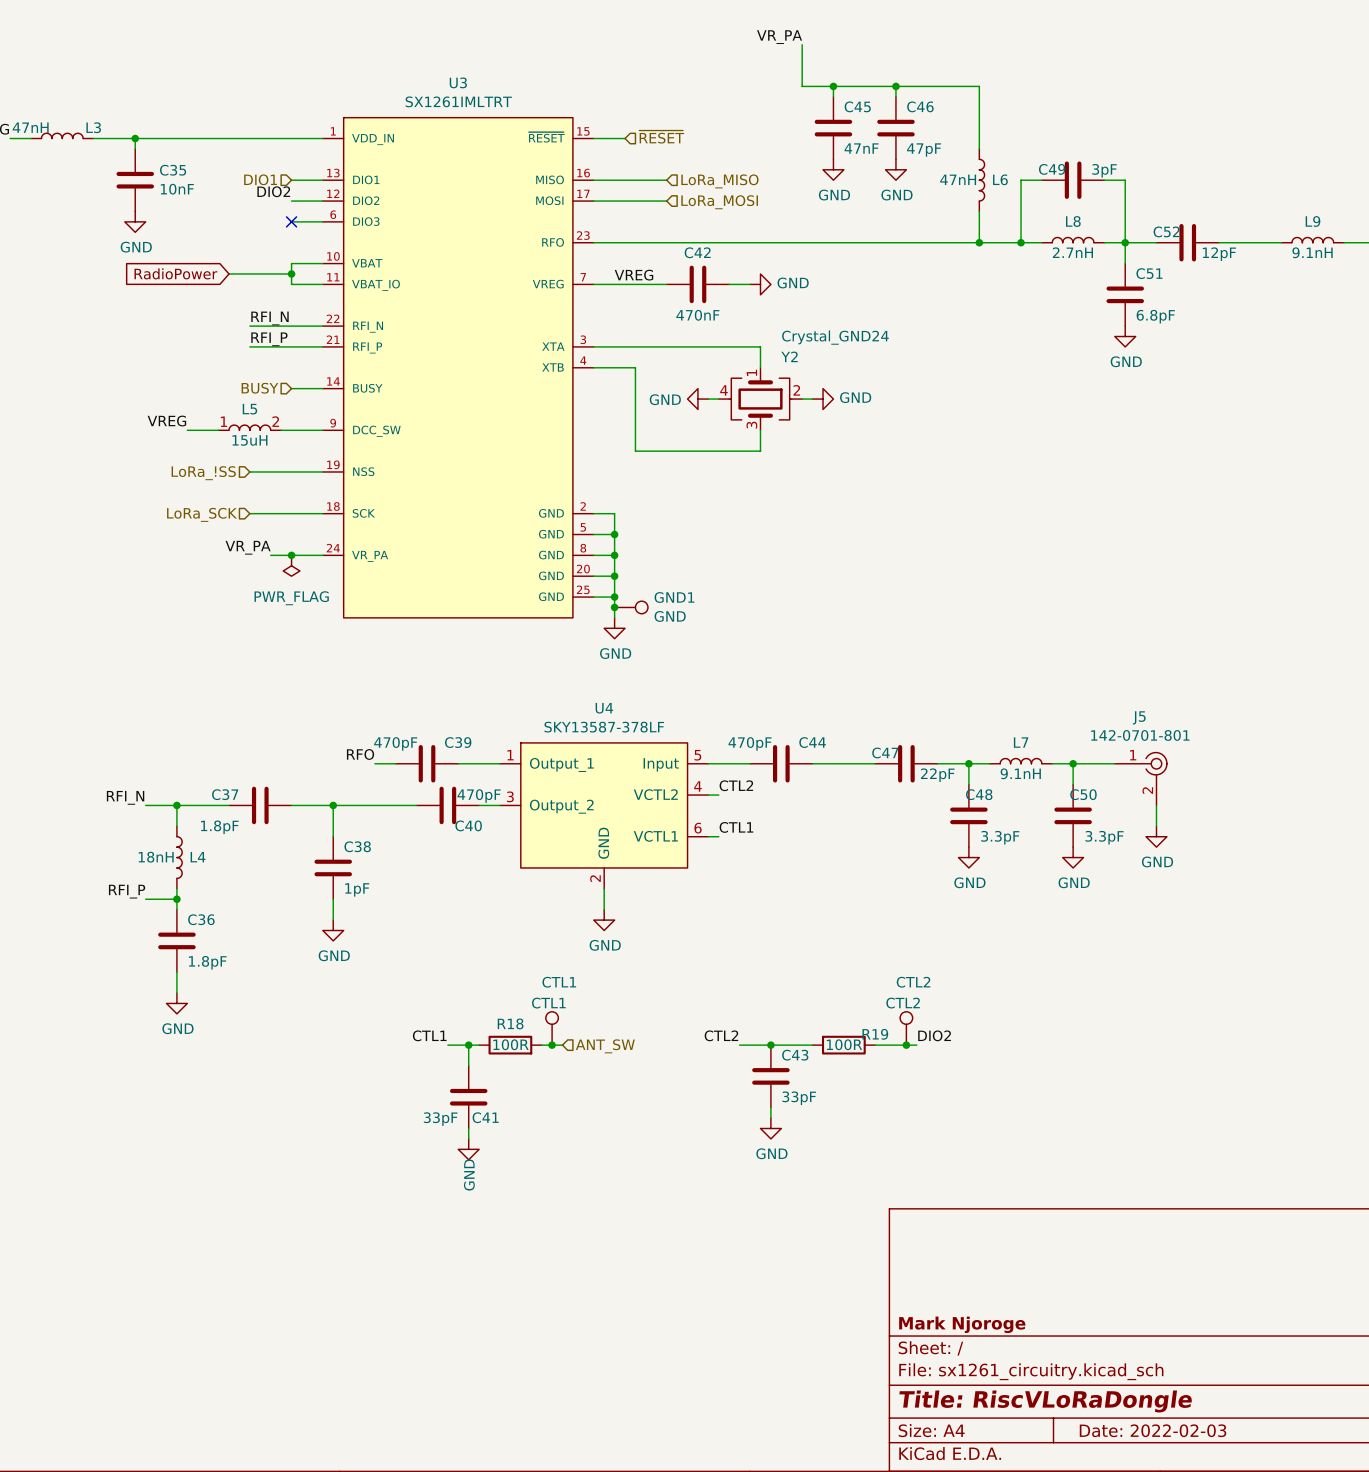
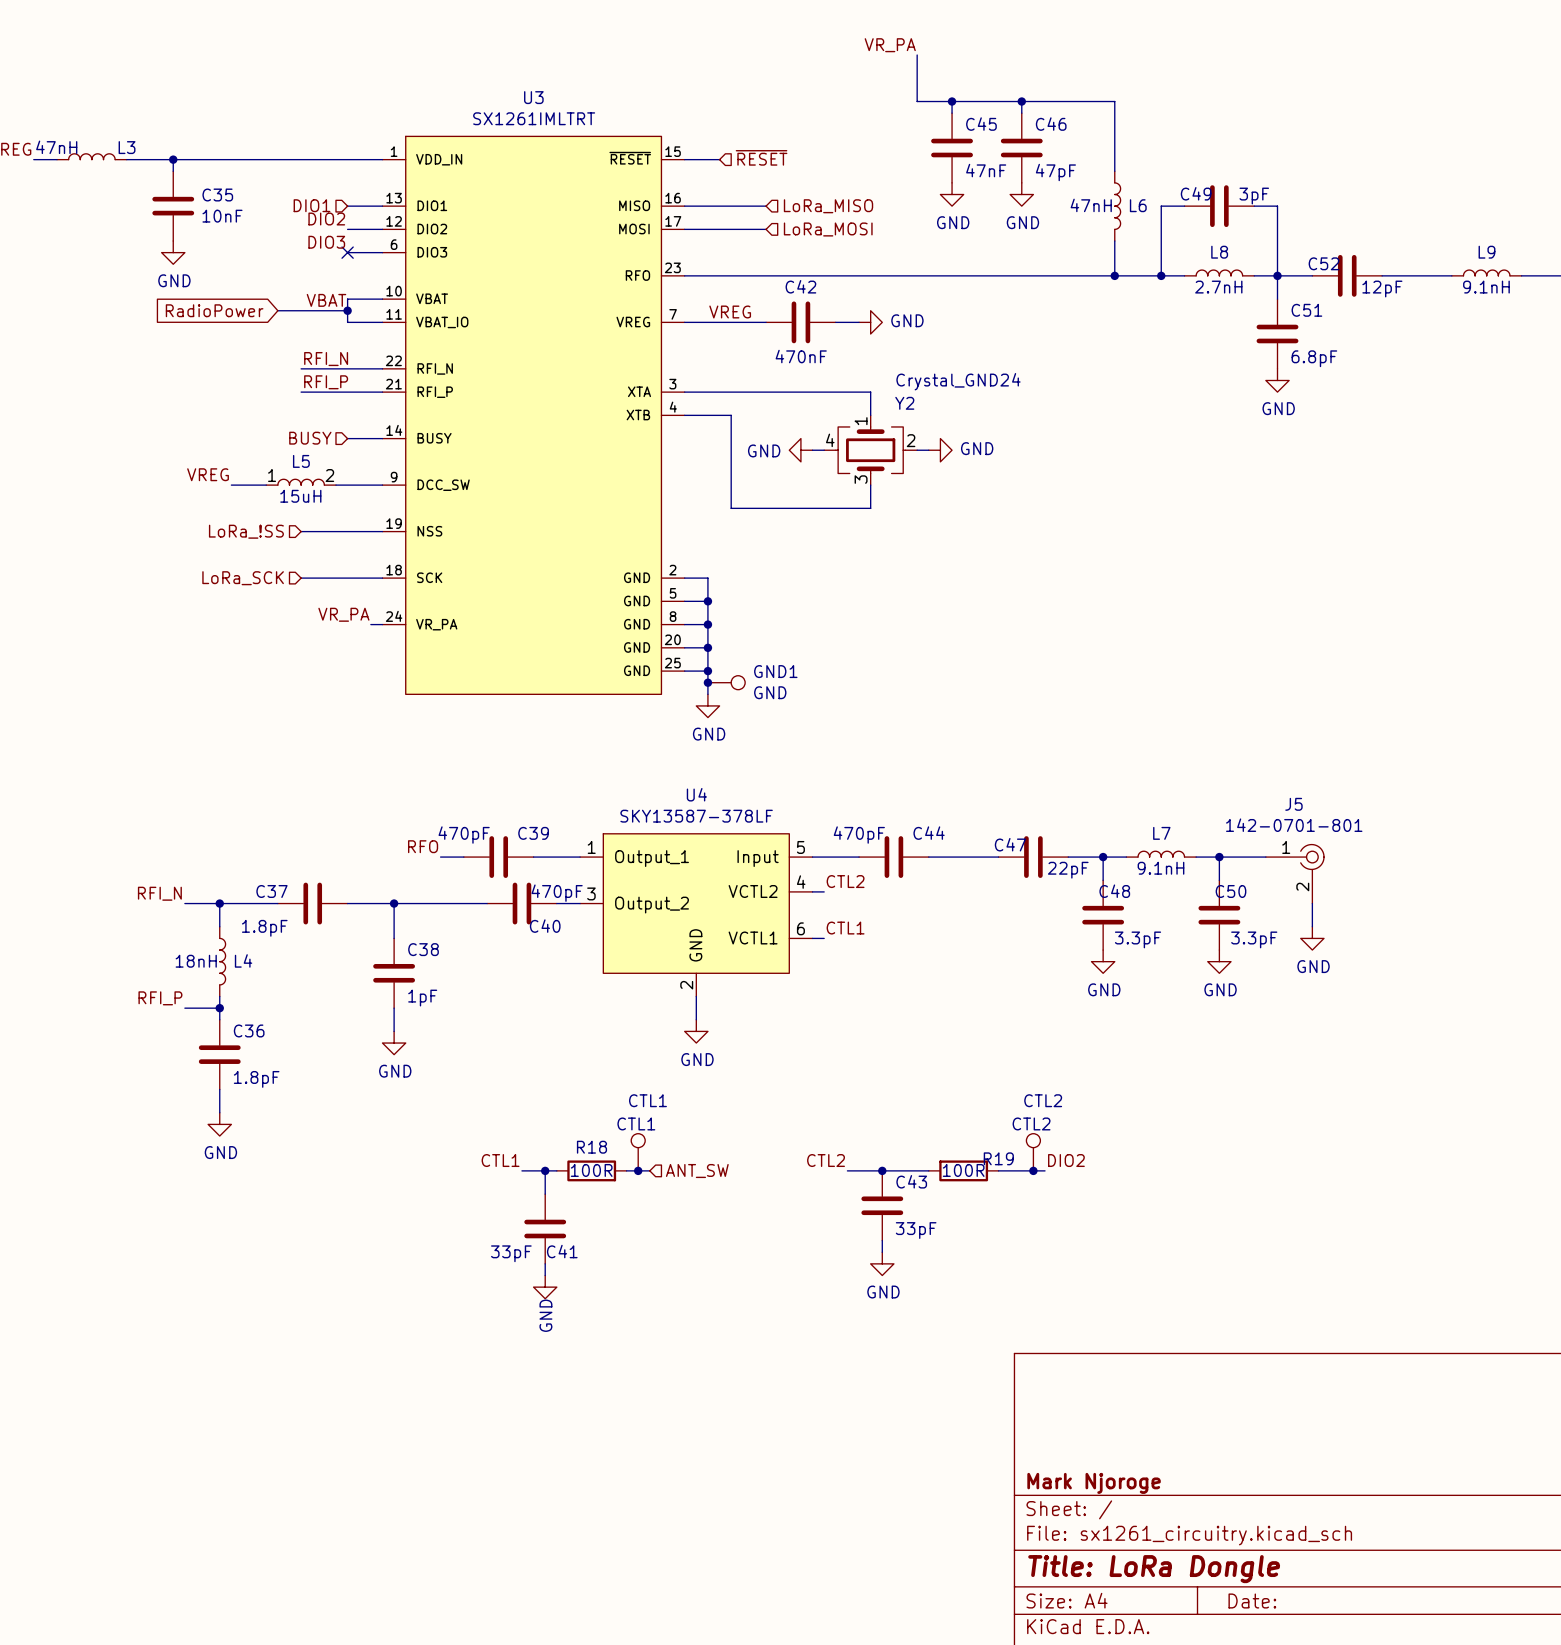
label: none -> DIO3 (326, 242)
label: none -> VBAT (326, 300)
label position: VR_PA (248, 547) -> VR_PA (343, 614)
wire: (270, 555) (312, 555) -> none
junction: (291, 555) -> none
power symbol: PWR_FLAG (291, 565) -> none
title block: Title: RiscVLoRaDongle (1045, 1401) -> Title: LoRa Dongle (1154, 1569)
title block: Date: 2022-02-03 (1153, 1430) -> Date: (1252, 1601)

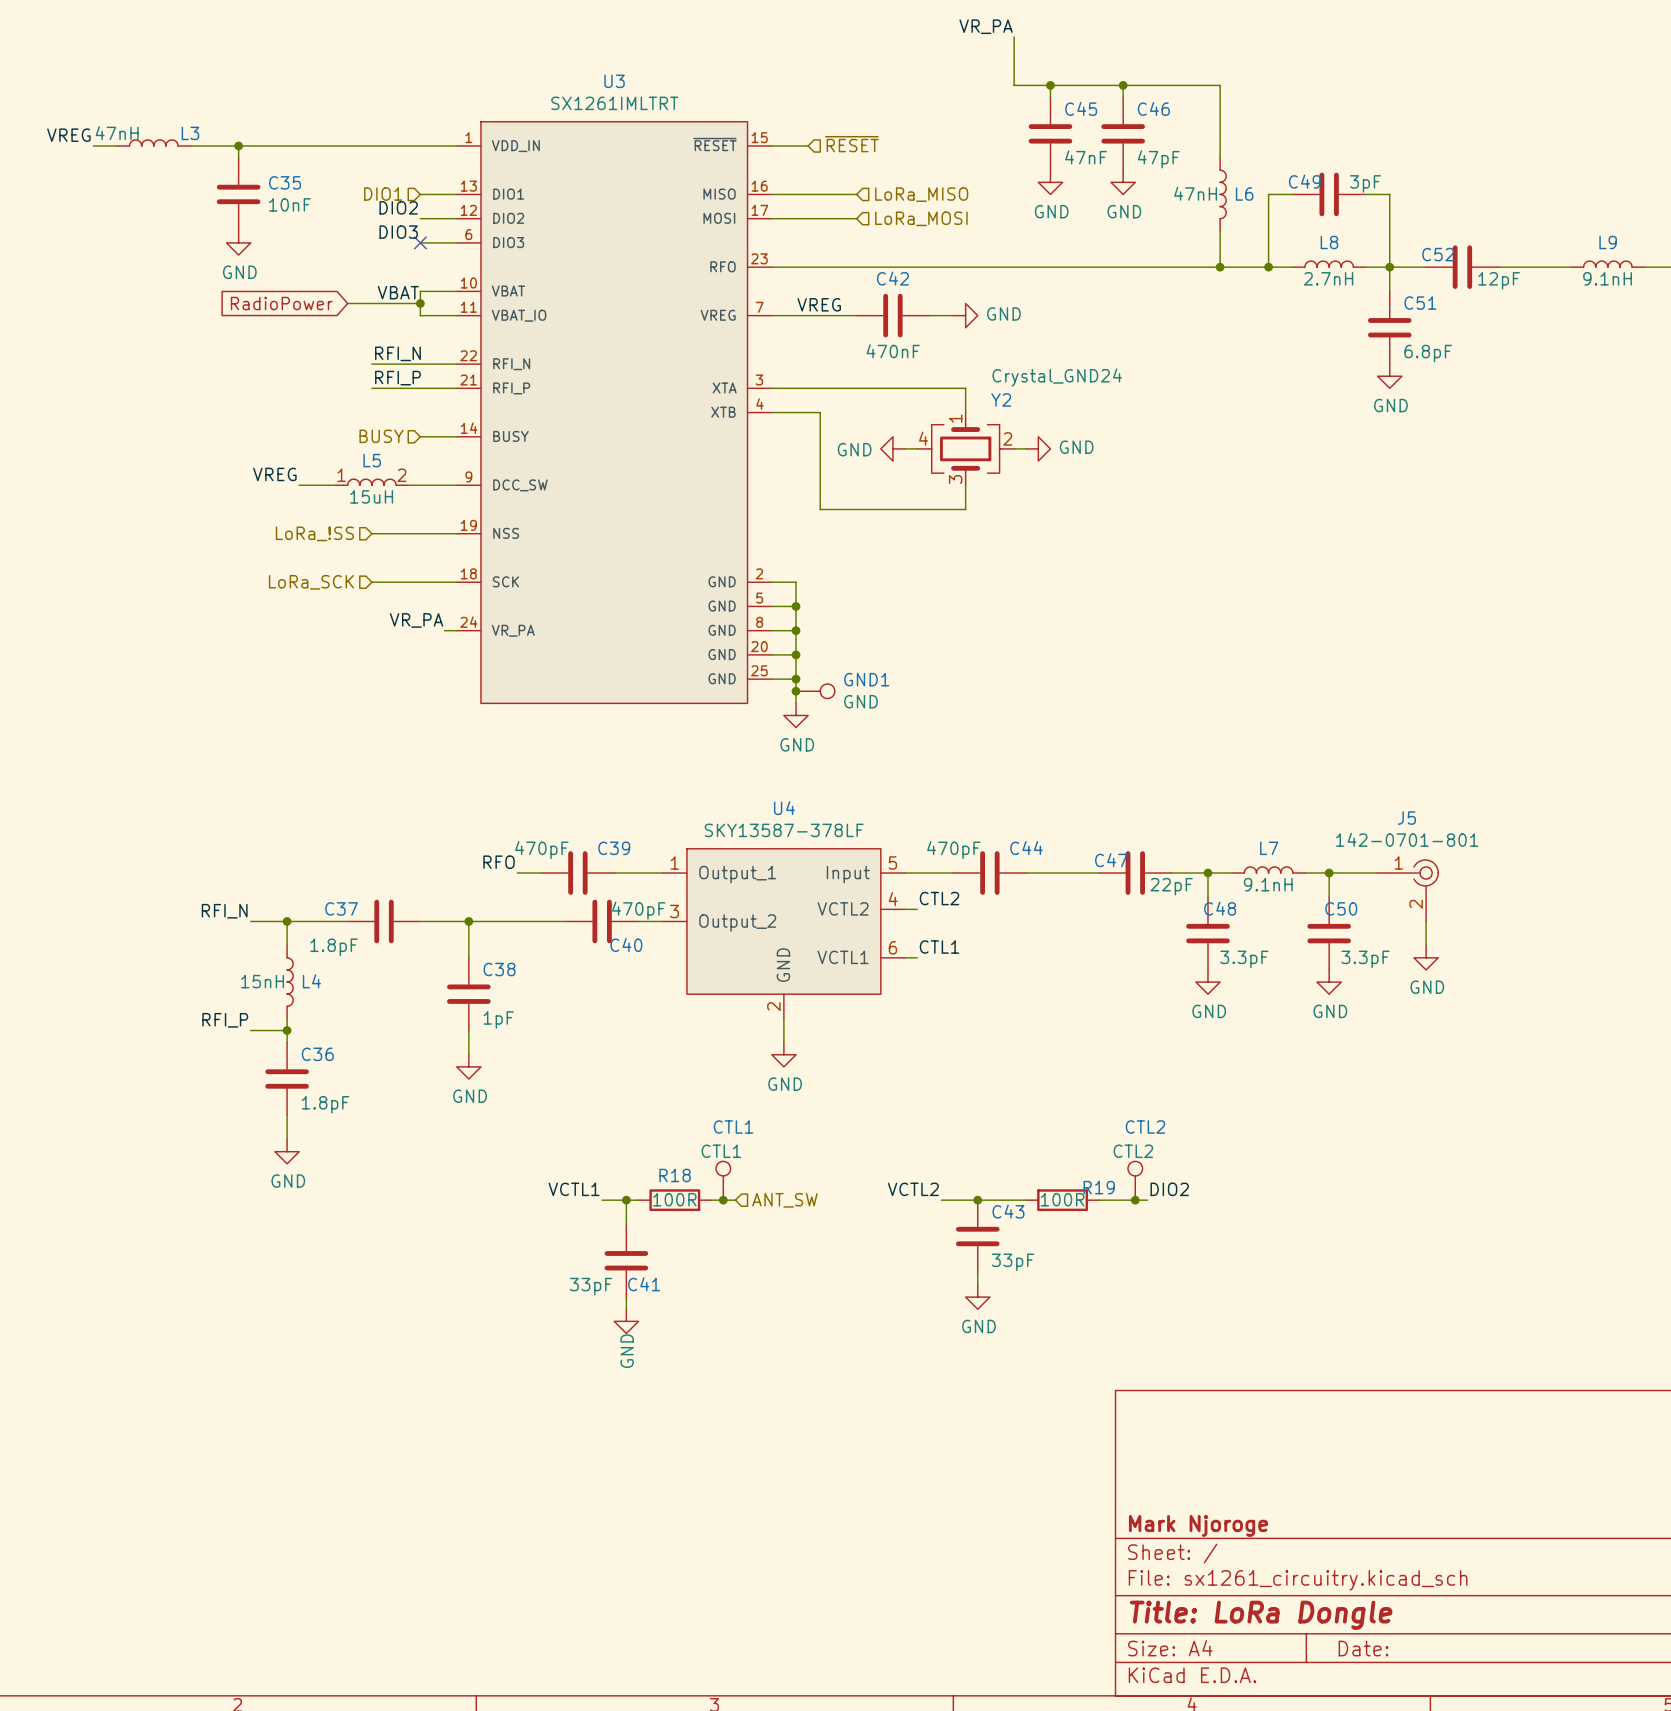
L4 value: 18nH (196, 961) -> 15nH (262, 981)
label: CTL1 (500, 1160) -> VCTL1 (574, 1189)
label: CTL2 (826, 1160) -> VCTL2 (913, 1189)

